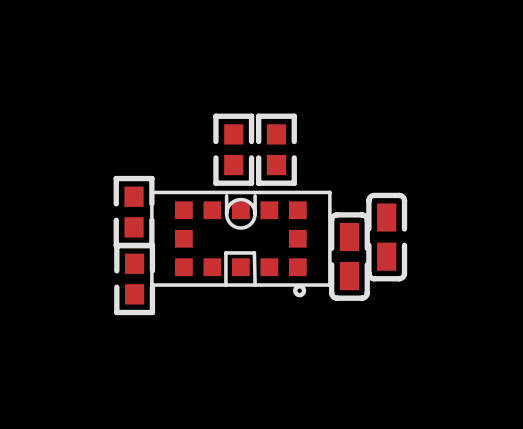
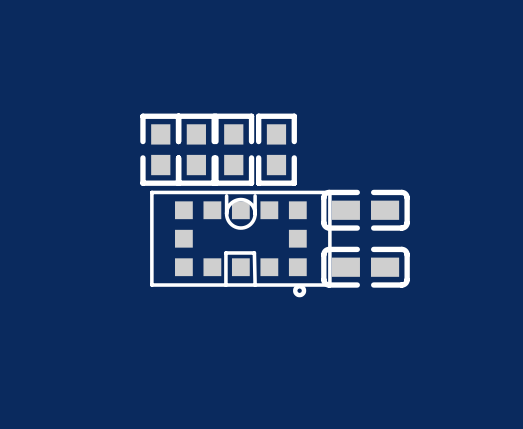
part: none -> (160, 149)
part: none -> (196, 149)
part: none -> (365, 210)
part: (134, 212) -> none
part: (386, 237) -> none
part: (349, 256) -> none
part: none -> (365, 267)
part: (134, 279) -> none

